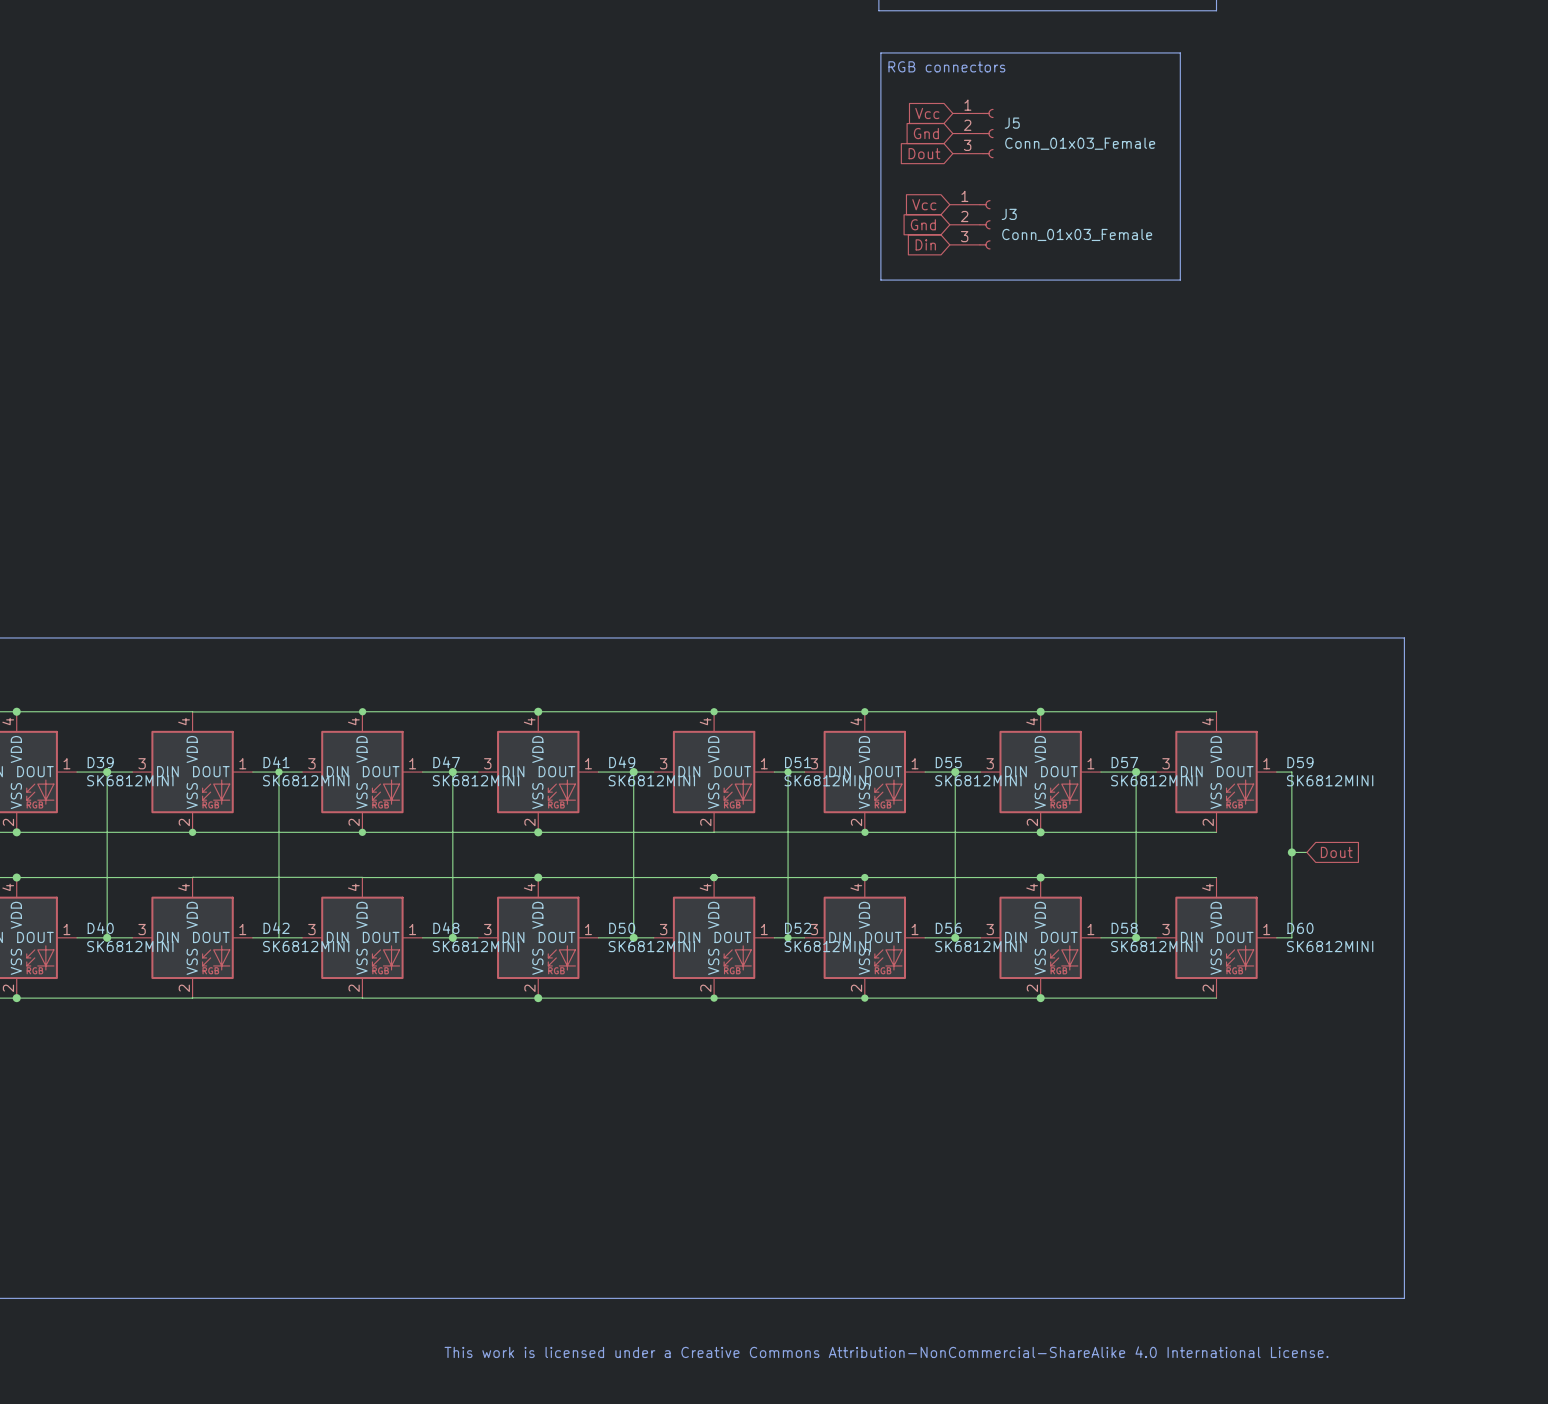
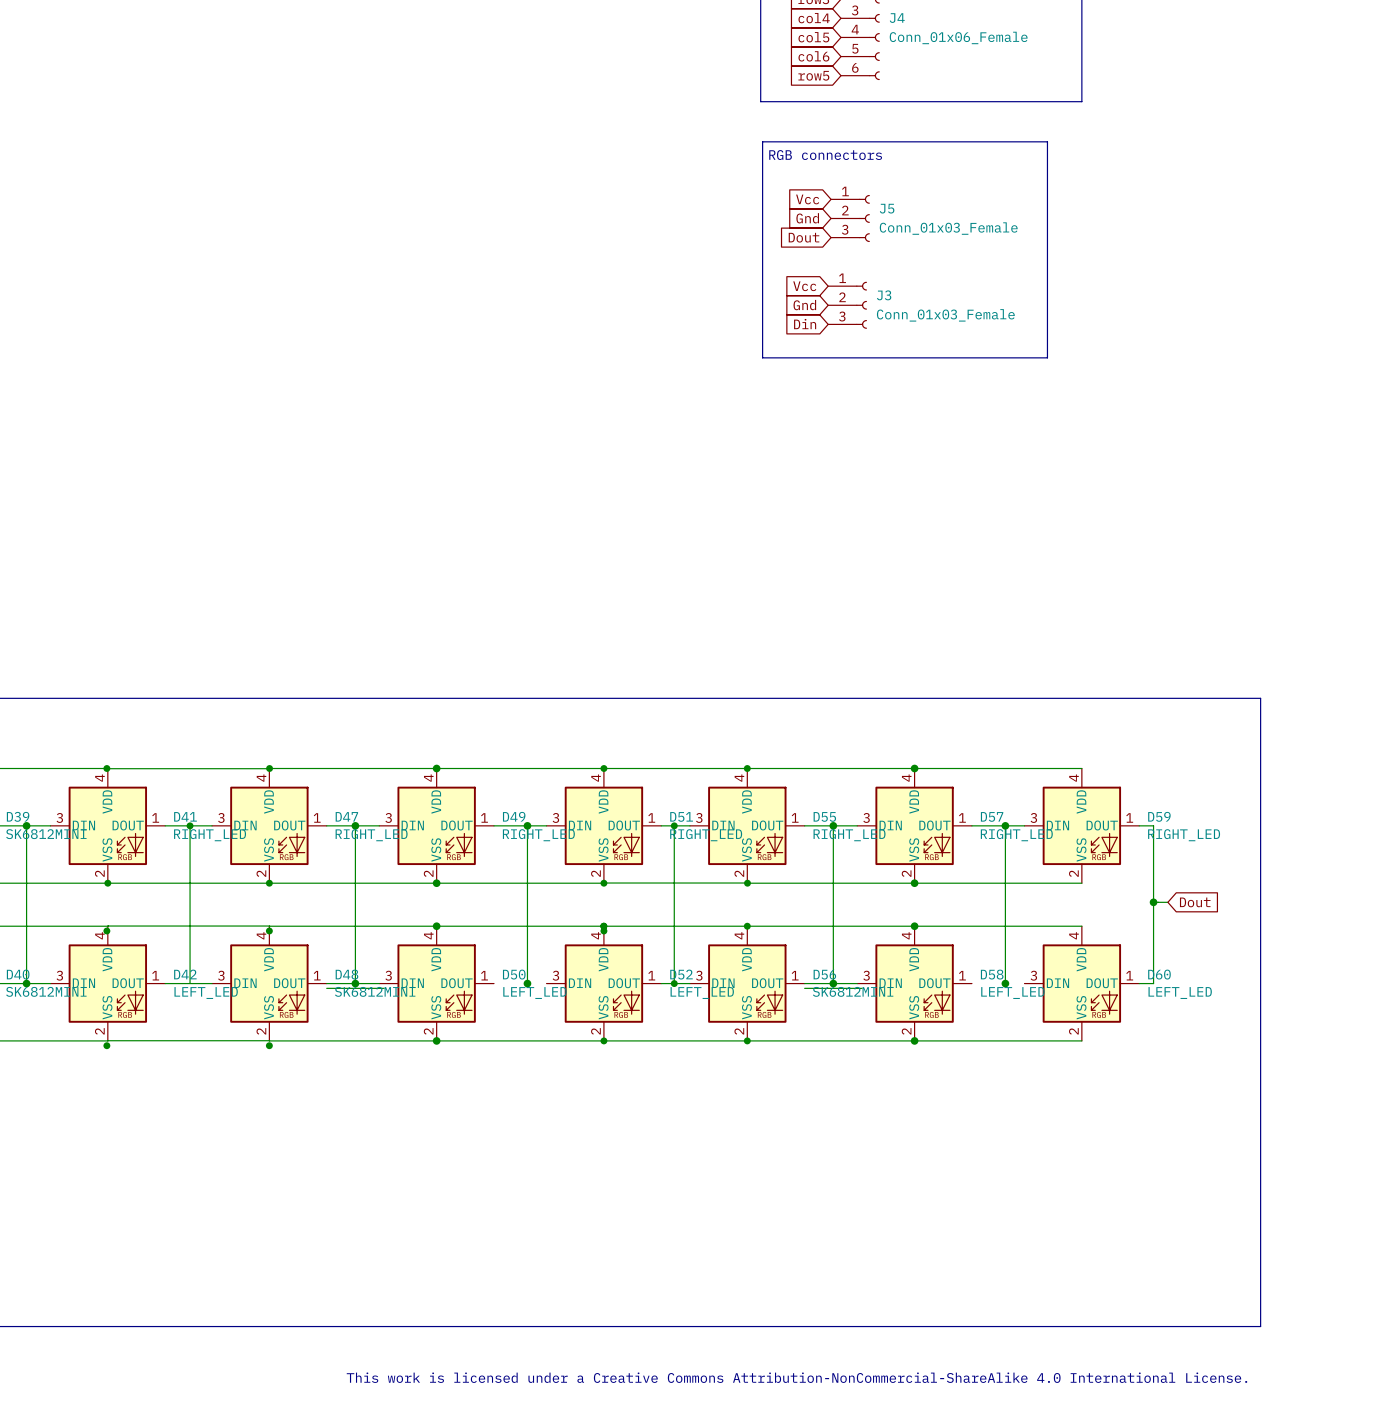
junction: none -> (106, 768)
D41 value: SK6812MINI (306, 780) -> RIGHT_LED (210, 835)
D47 value: SK6812MINI (476, 780) -> RIGHT_LED (371, 835)
D49 value: SK6812MINI (651, 780) -> RIGHT_LED (538, 835)
D51 value: SK6812MINI (827, 780) -> RIGHT_LED (706, 835)
D55 value: SK6812MINI (978, 780) -> RIGHT_LED (849, 835)
D57 value: SK6812MINI (1154, 780) -> RIGHT_LED (1016, 835)
D59 value: SK6812MINI (1330, 780) -> RIGHT_LED (1184, 835)
junction: none -> (603, 883)
junction: none -> (106, 931)
junction: none -> (269, 931)
junction: none -> (603, 931)
wire: (598, 937) (653, 937) -> none
wire: (1100, 937) (1156, 937) -> none
wire: none -> (326, 988) (384, 988)
wire: none -> (804, 988) (862, 988)
D42 value: SK6812MINI (306, 946) -> LEFT_LED (206, 993)
D50 value: SK6812MINI (651, 946) -> LEFT_LED (534, 993)
D52 value: SK6812MINI (827, 946) -> LEFT_LED (702, 993)
D58 value: SK6812MINI (1154, 946) -> LEFT_LED (1012, 993)
D60 value: SK6812MINI (1330, 946) -> LEFT_LED (1180, 993)
junction: none -> (106, 1045)
junction: none -> (269, 1045)

